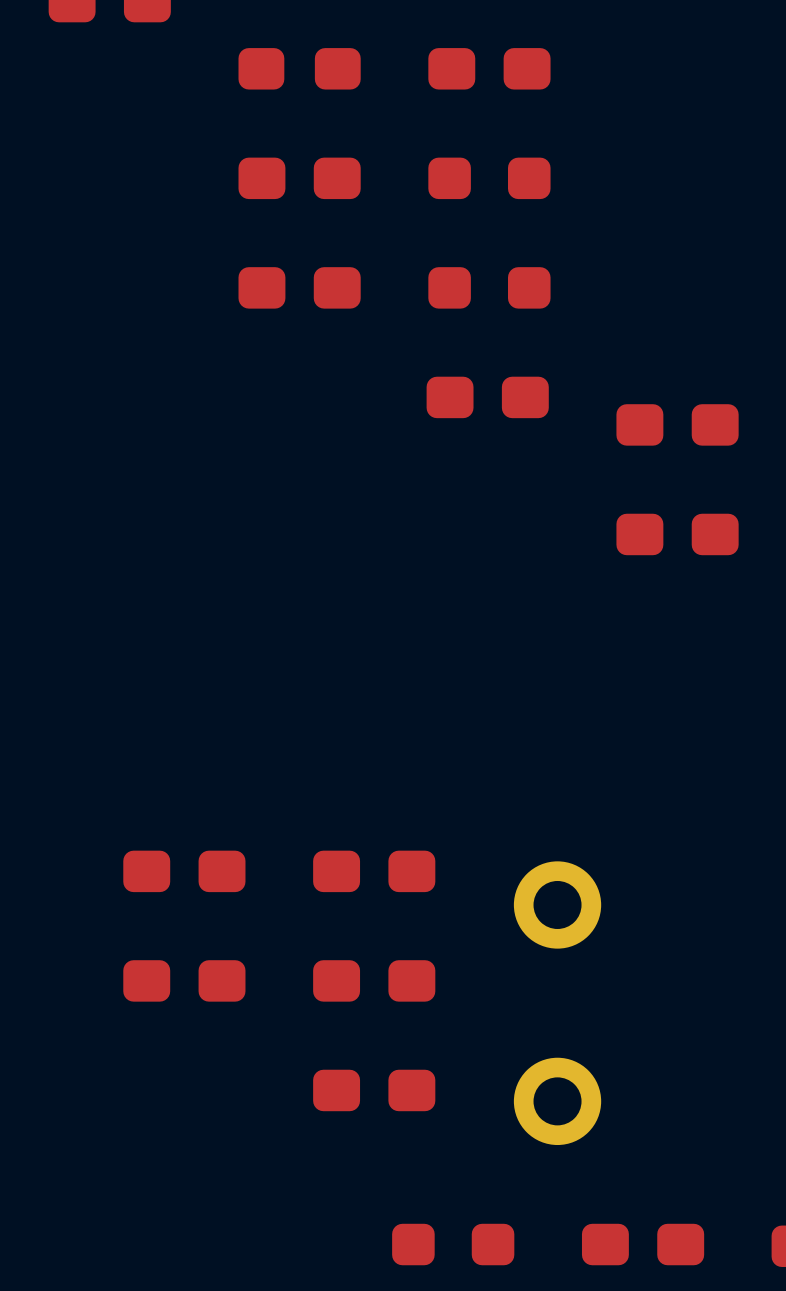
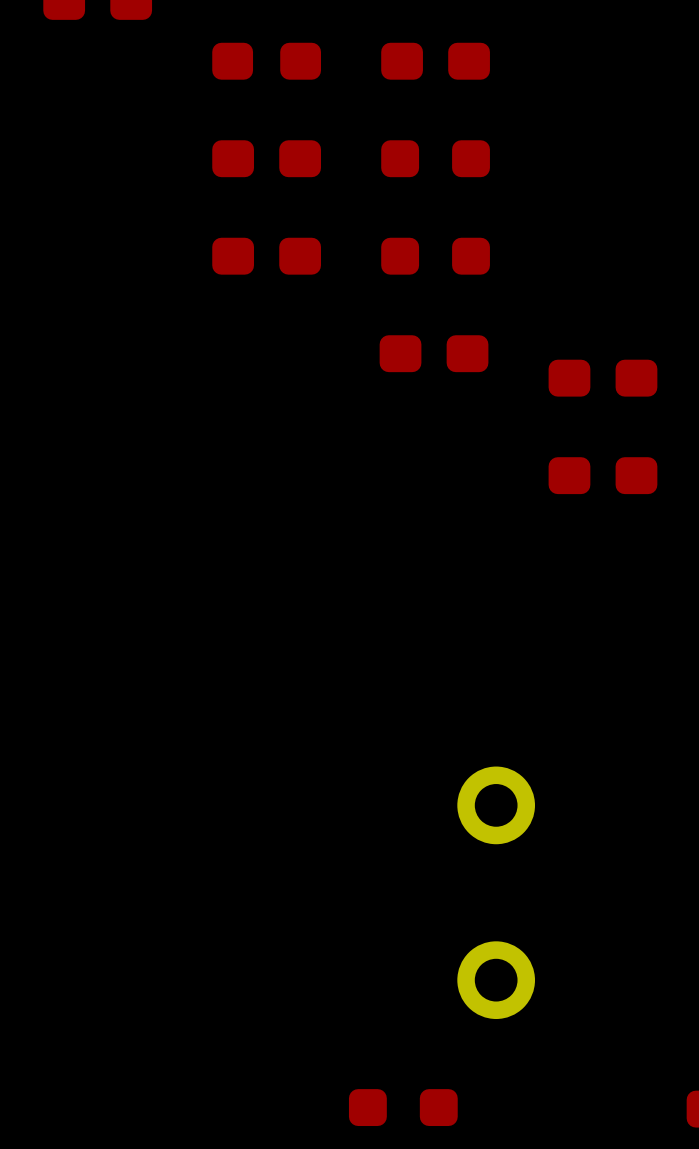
part: (184, 871) -> none
part: (374, 871) -> none
part: (184, 980) -> none
part: (374, 980) -> none
part: (374, 1090) -> none
part: (643, 1244) -> none

